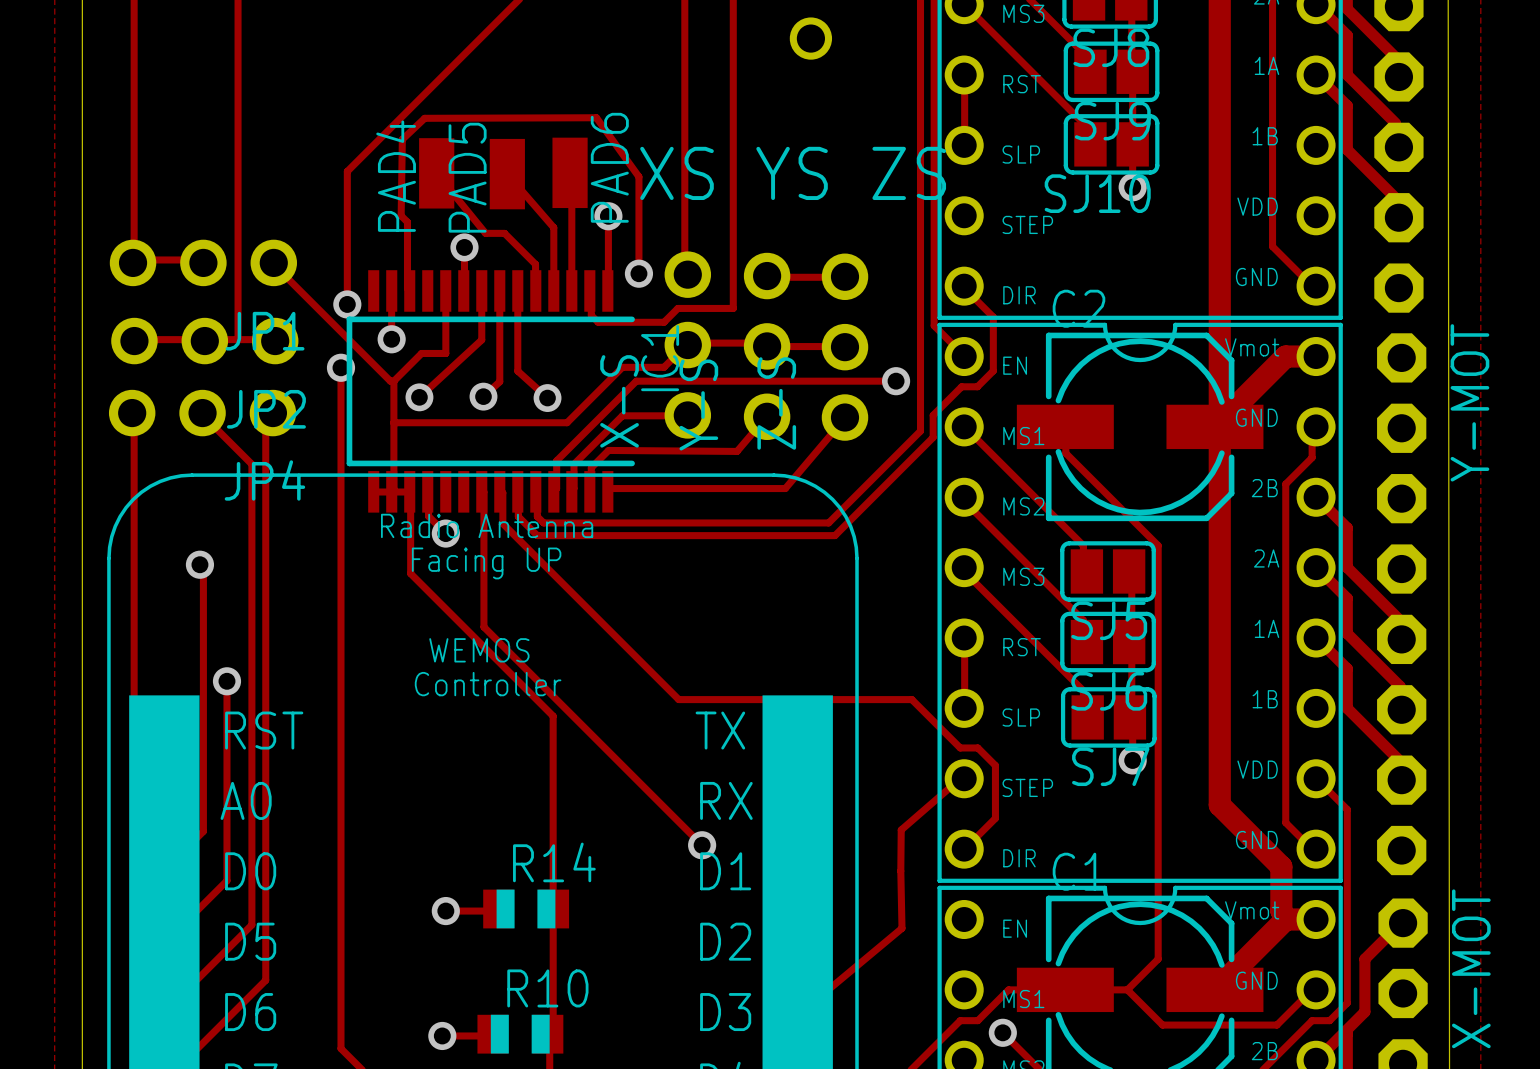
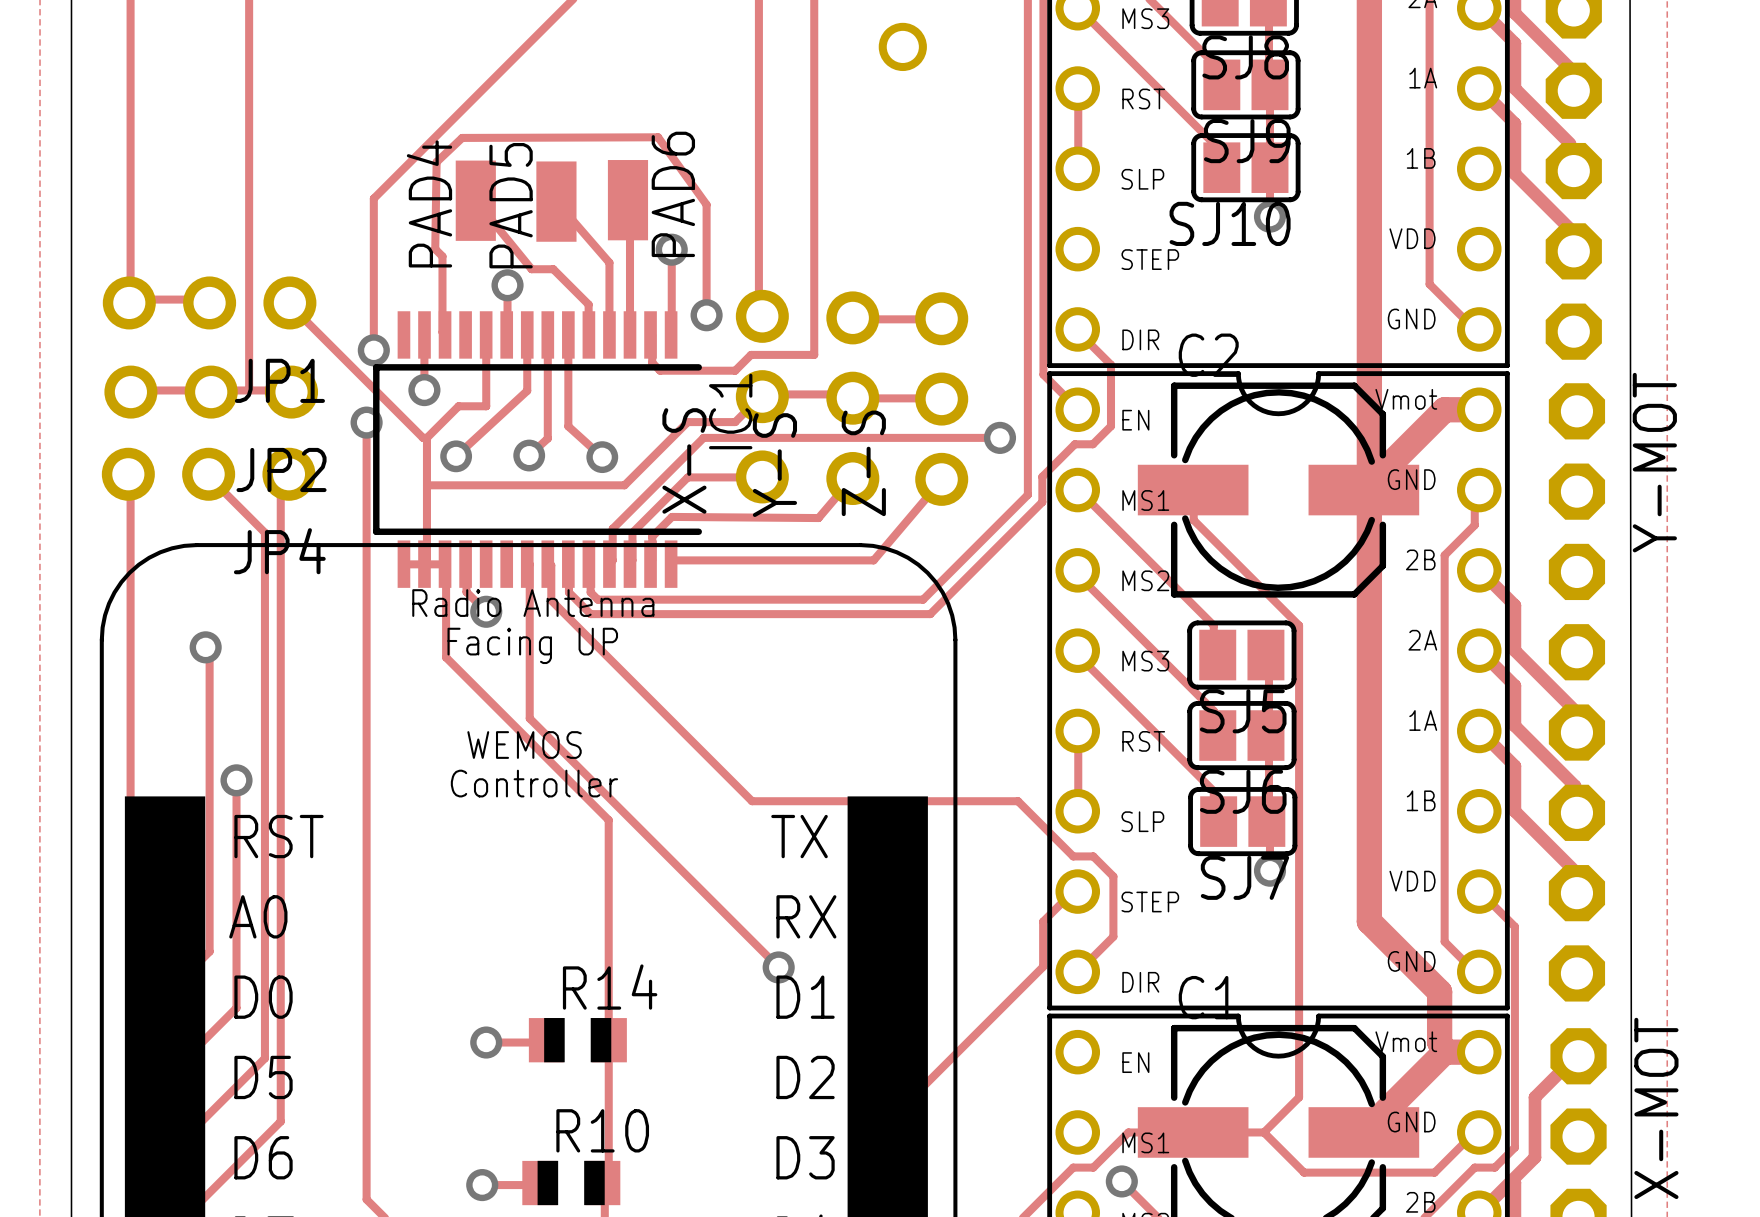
text: XS YS ZS (793, 173) -> none
track: (960, 778) (901, 829) (902, 928) (801, 1011) -> (1073, 891) (1043, 921) (1043, 966) (892, 1117) (892, 1157)

